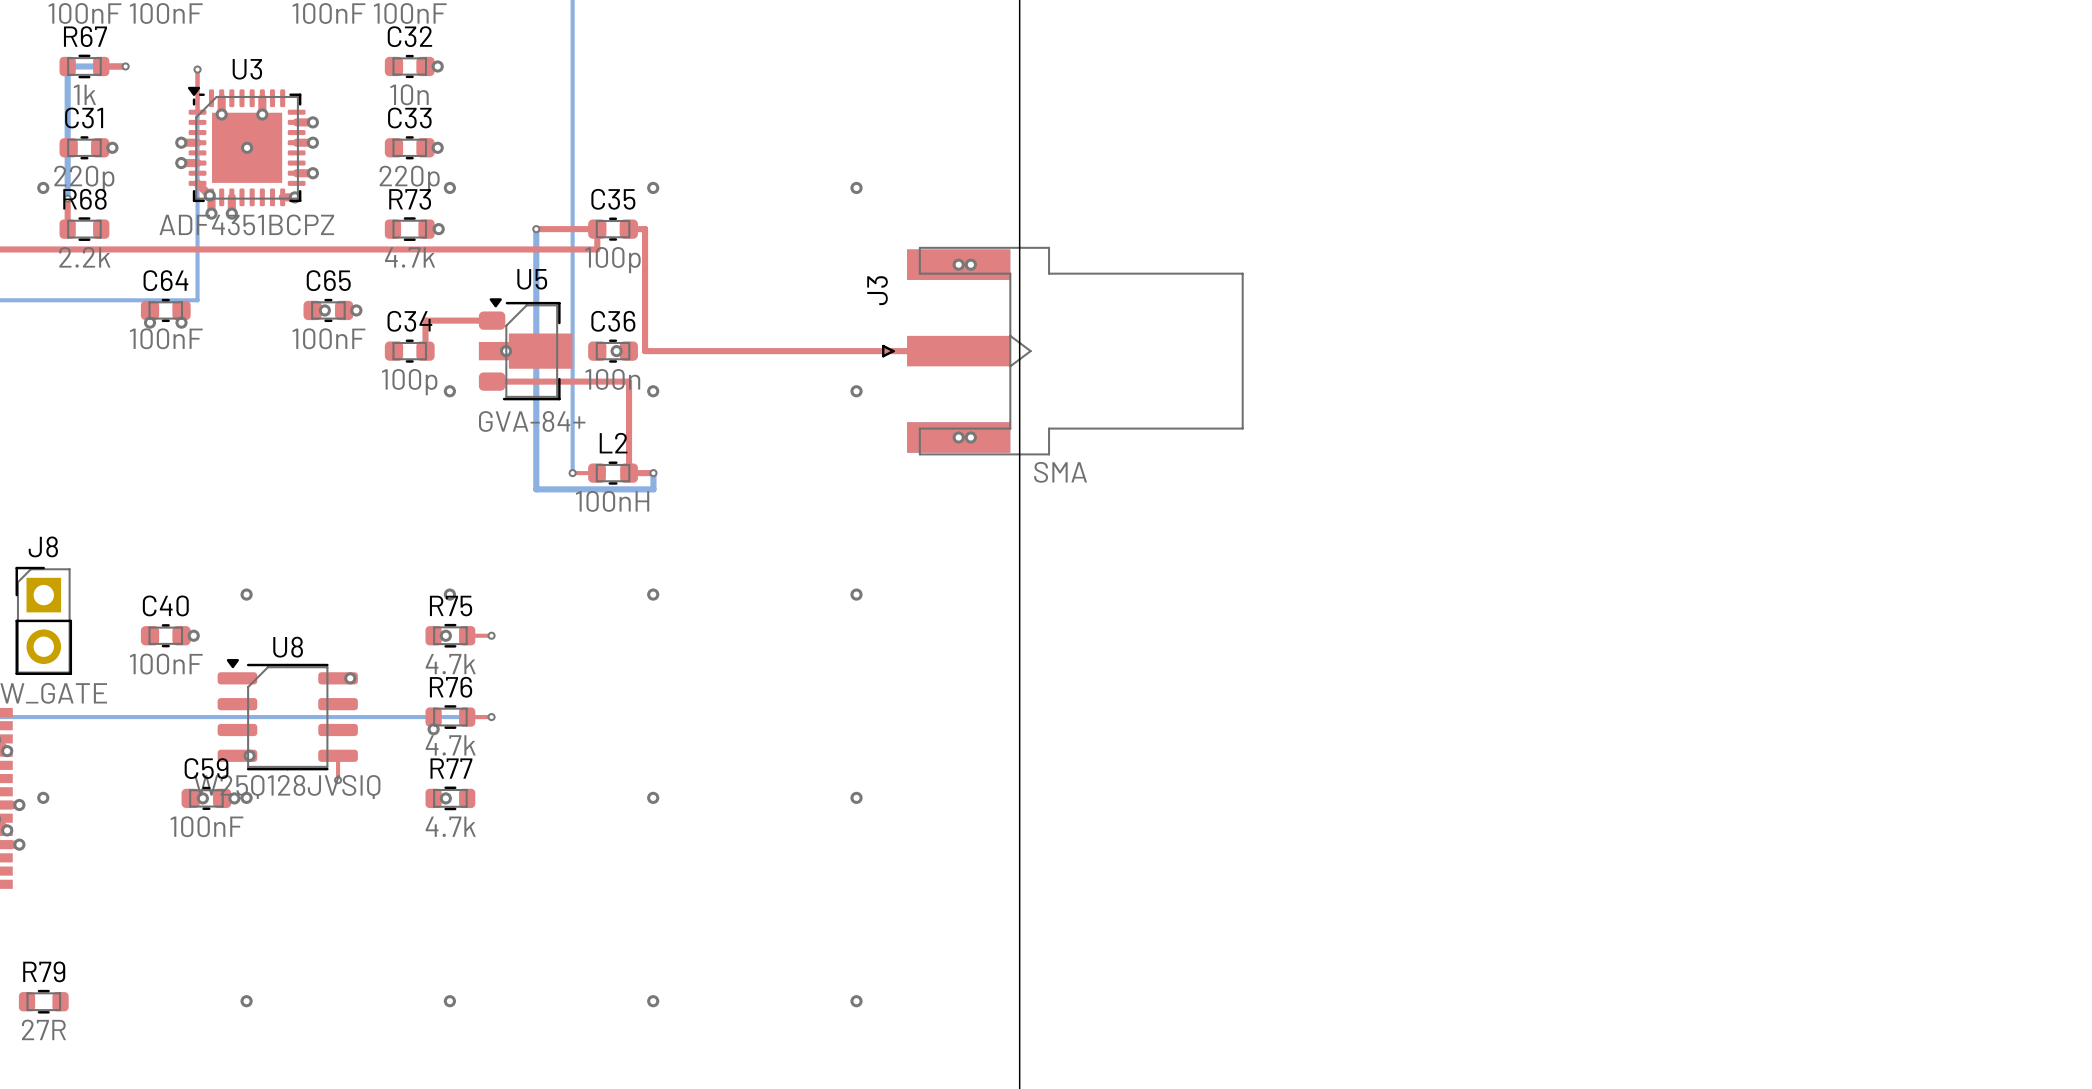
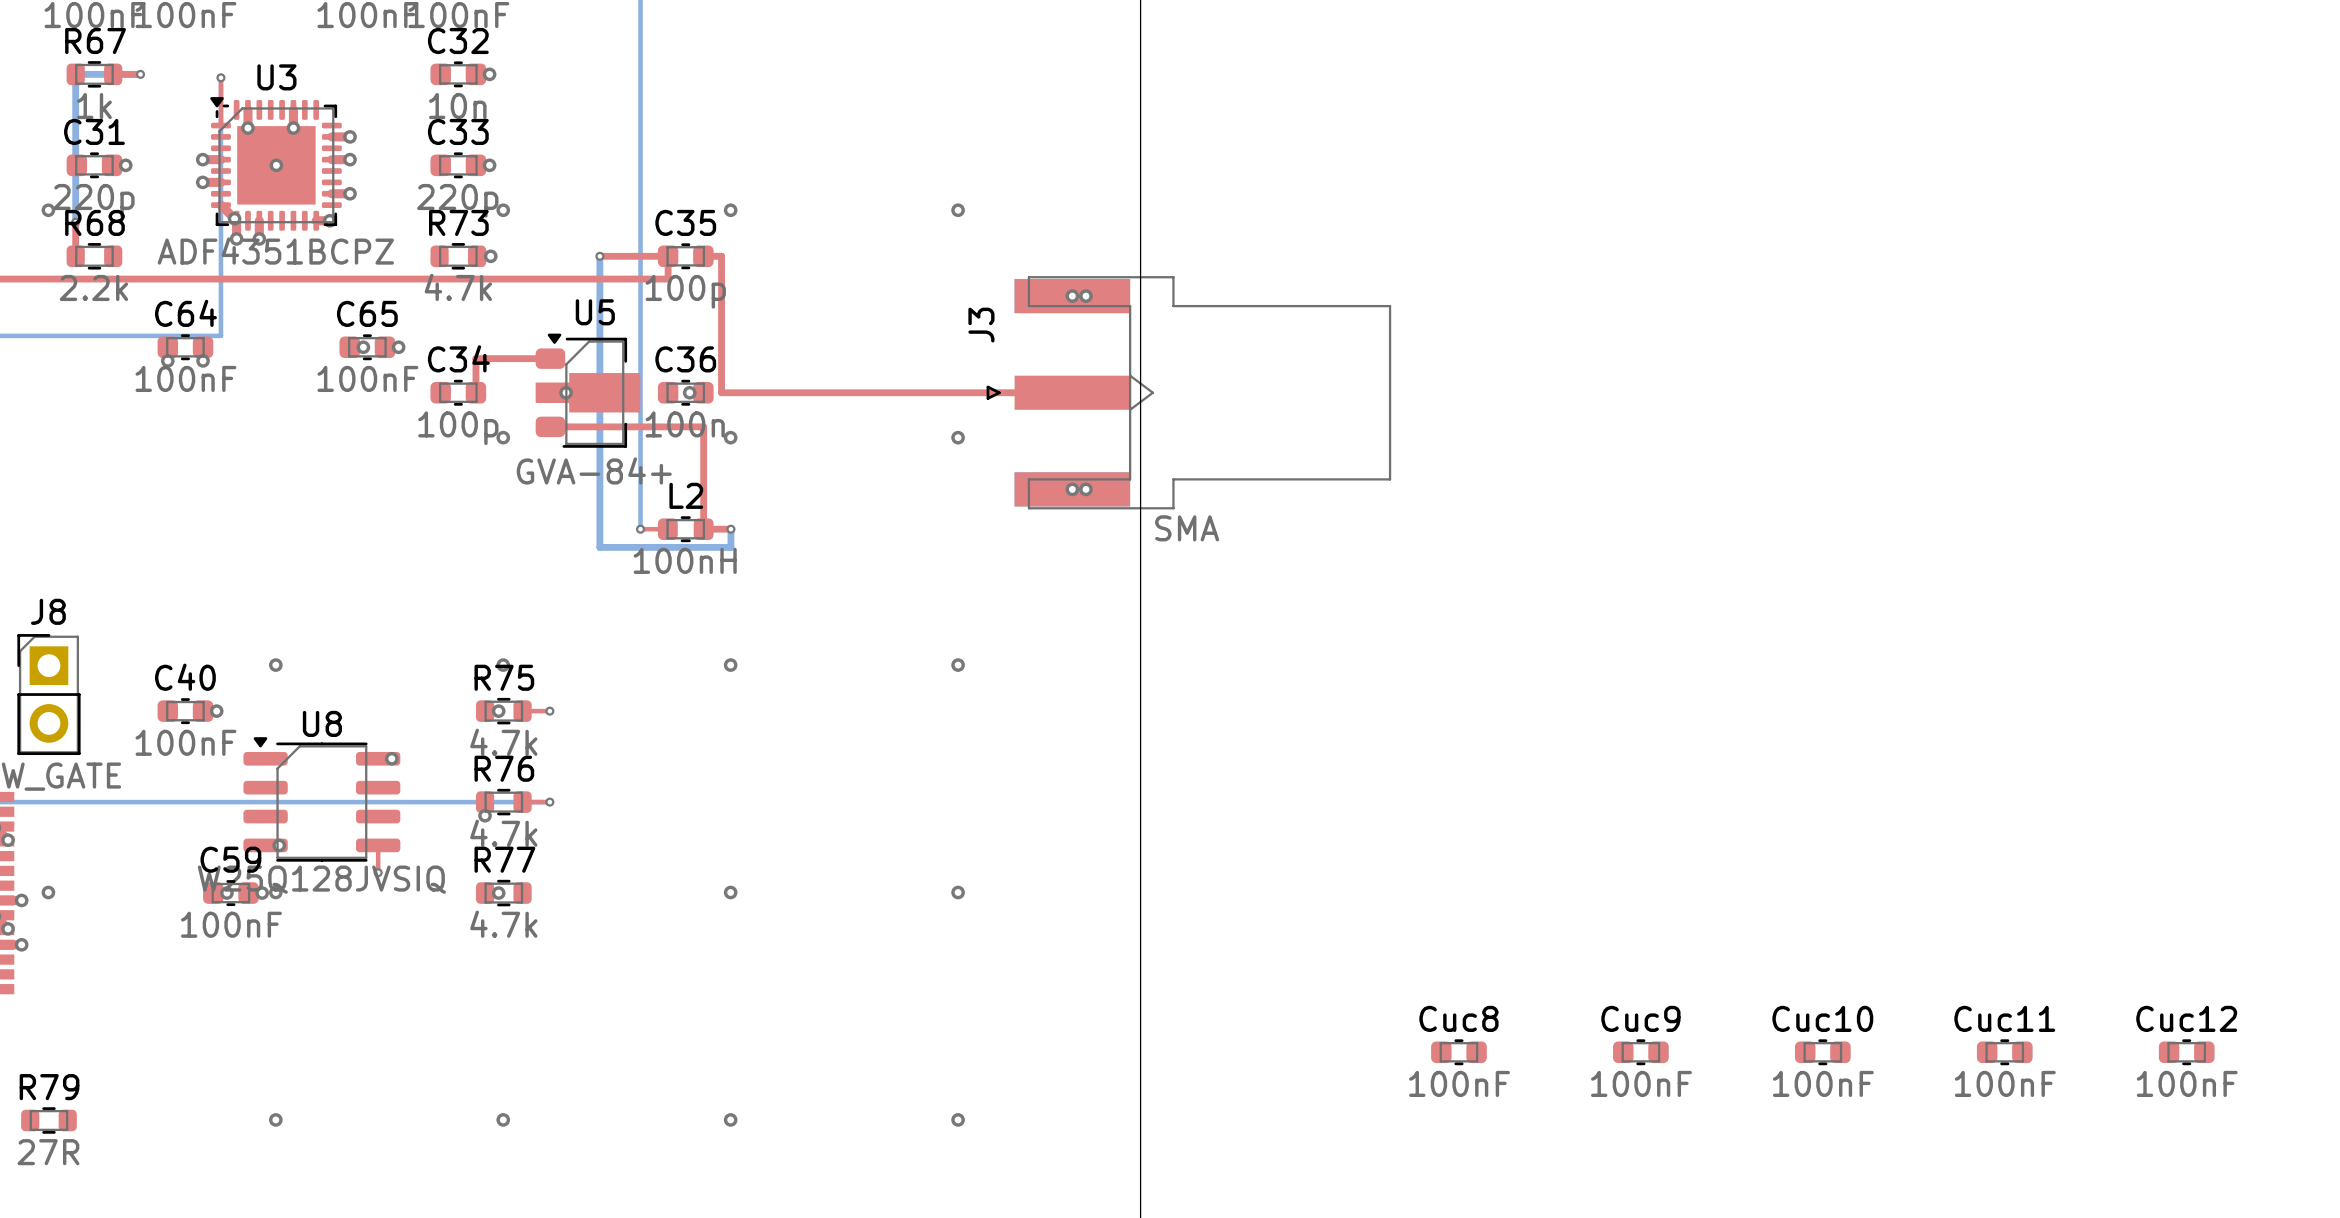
Cuc8: none -> 100nF (1458, 1052)
Cuc9: none -> 100nF (1640, 1052)
Cuc10: none -> 100nF (1822, 1052)
Cuc11: none -> 100nF (2004, 1052)
Cuc12: none -> 100nF (2186, 1052)

